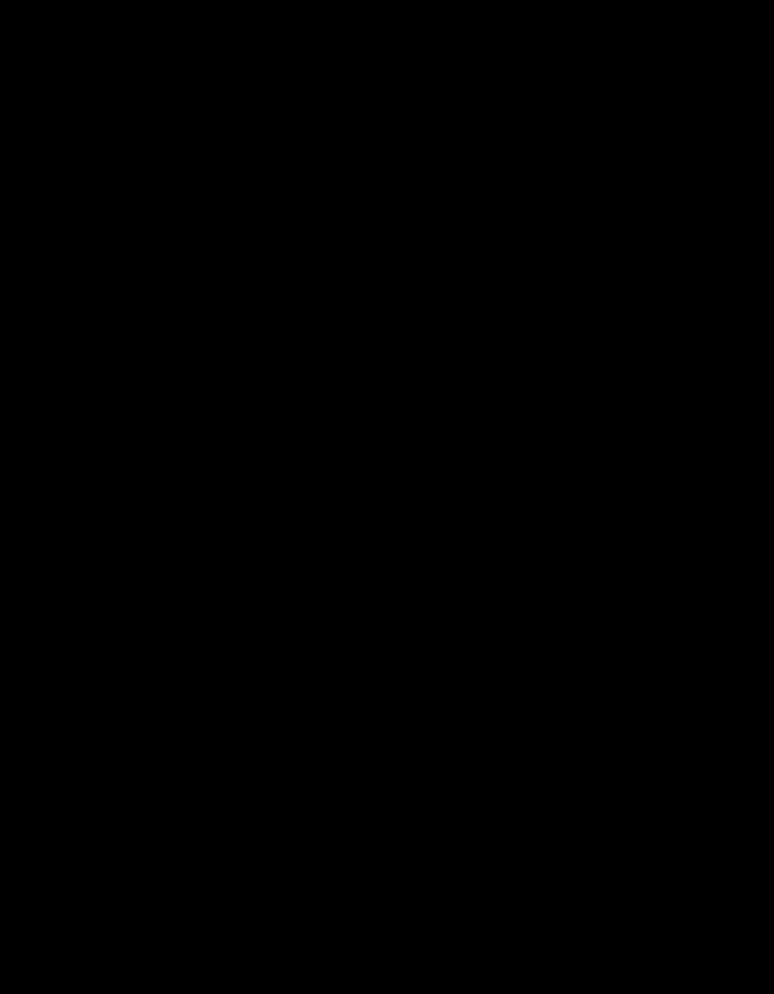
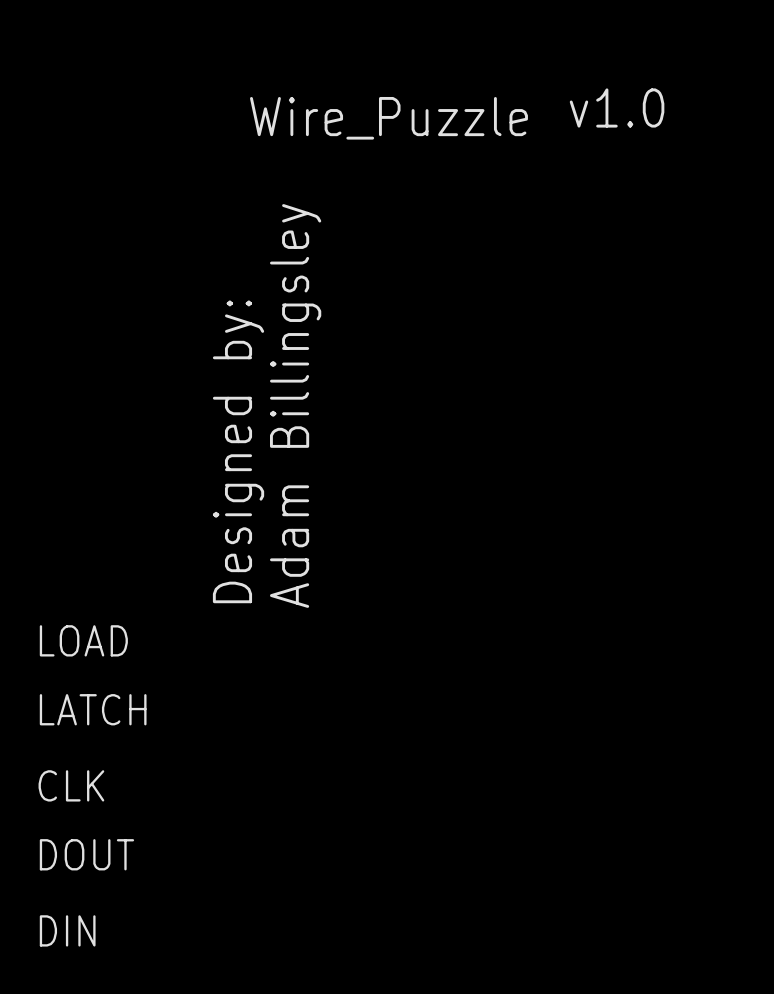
text: none -> v1.0 (617, 107)
text: none -> Wire_Puzzle (388, 118)
text: none -> Adam Billingsley (295, 405)
text: none -> Designed by: (238, 451)
text: none -> LOAD (83, 640)
text: none -> LATCH (93, 709)
text: none -> CLK (71, 785)
text: none -> DOUT (86, 854)
text: none -> DIN (67, 930)

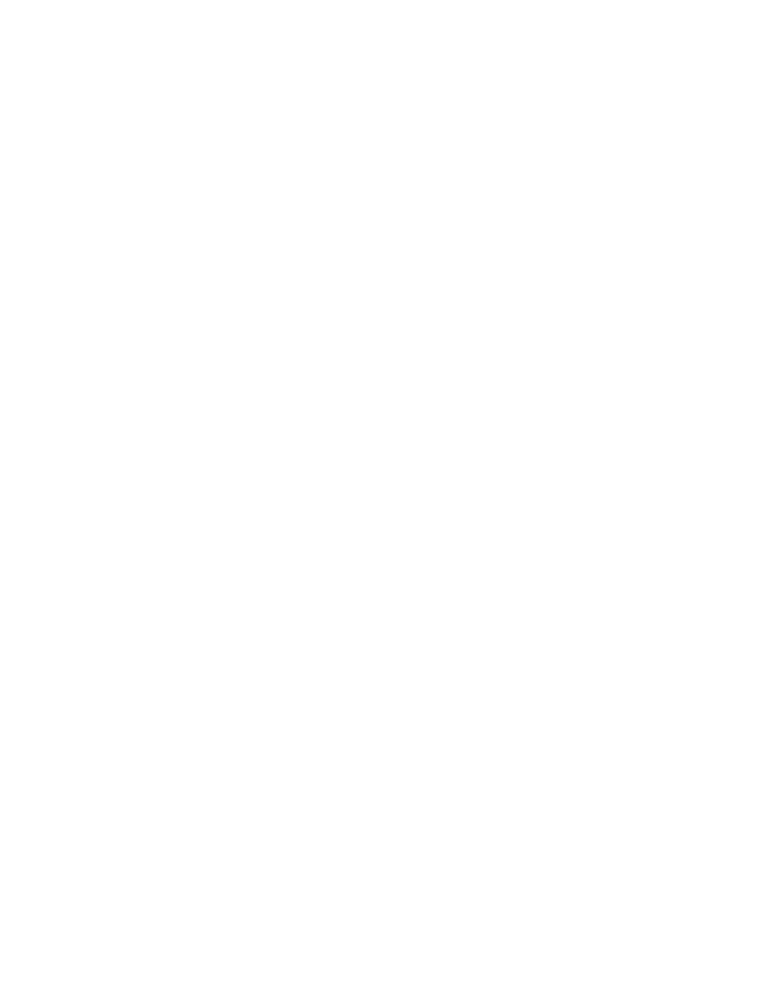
text: v1.0 (617, 107) -> none
text: Wire_Puzzle (388, 118) -> none
text: Adam Billingsley (295, 405) -> none
text: Designed by: (238, 451) -> none
text: LOAD (83, 640) -> none
text: LATCH (93, 709) -> none
text: CLK (71, 785) -> none
text: DOUT (86, 854) -> none
text: DIN (67, 930) -> none

